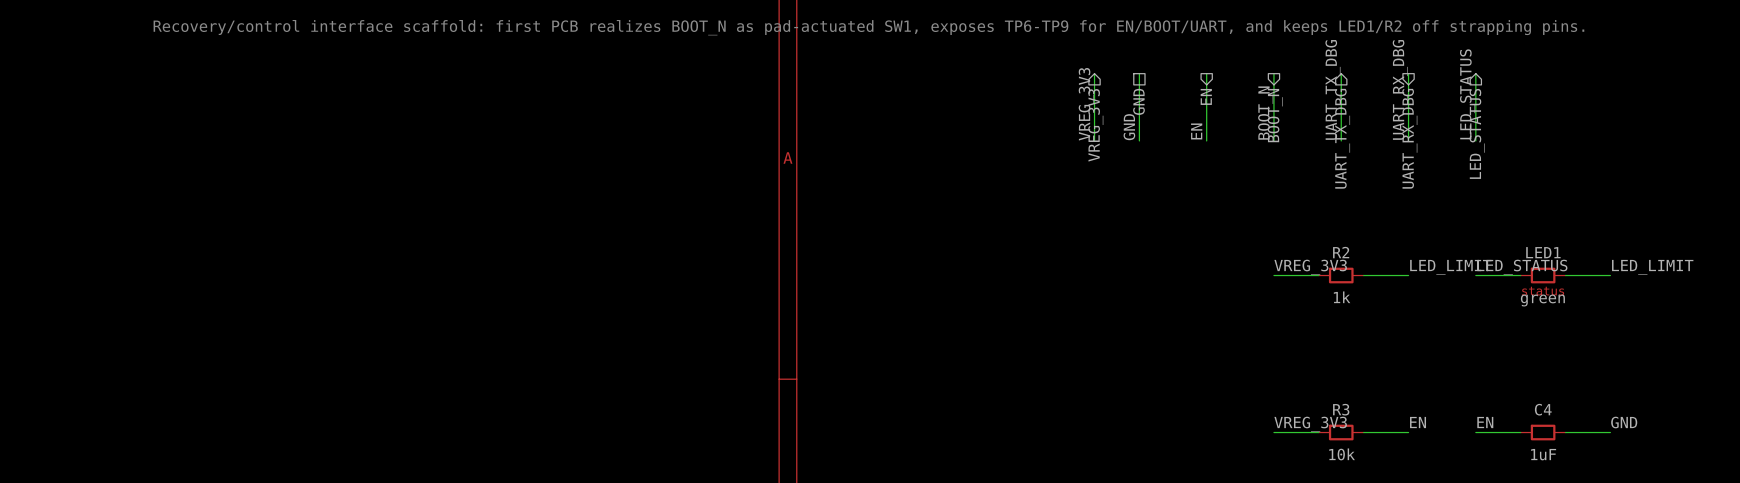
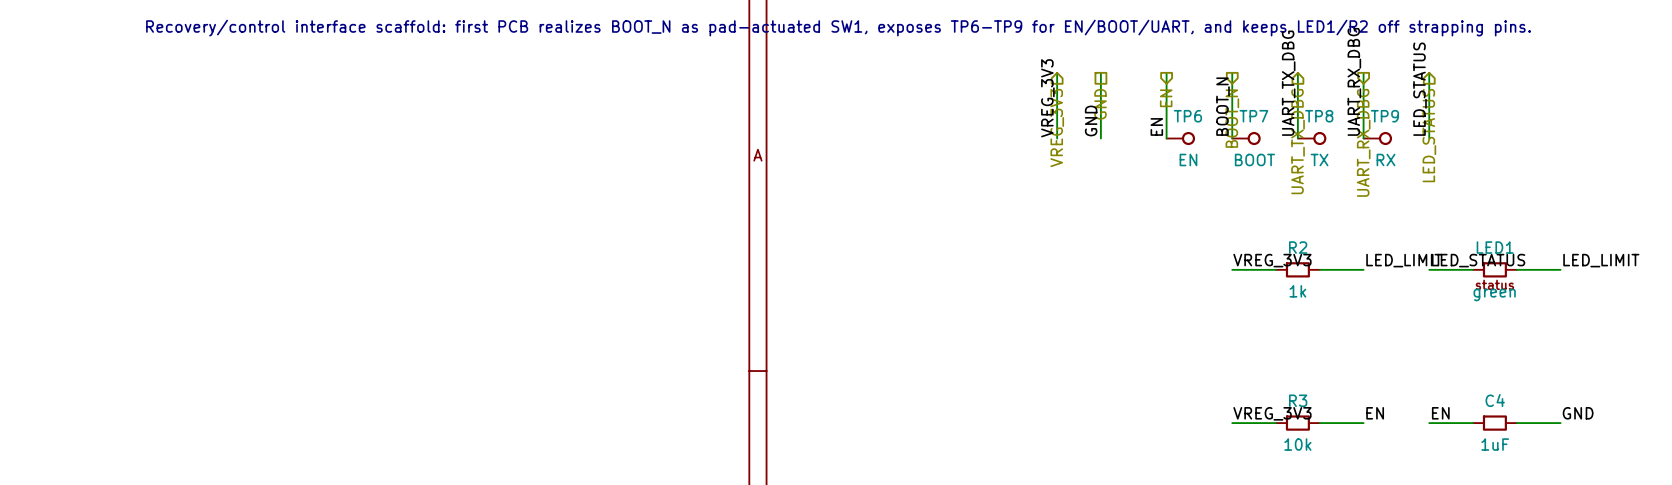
TP6: none -> EN (1180, 138)
TP7: none -> BOOT (1246, 138)
TP8: none -> TX (1312, 138)
TP9: none -> RX (1377, 138)

